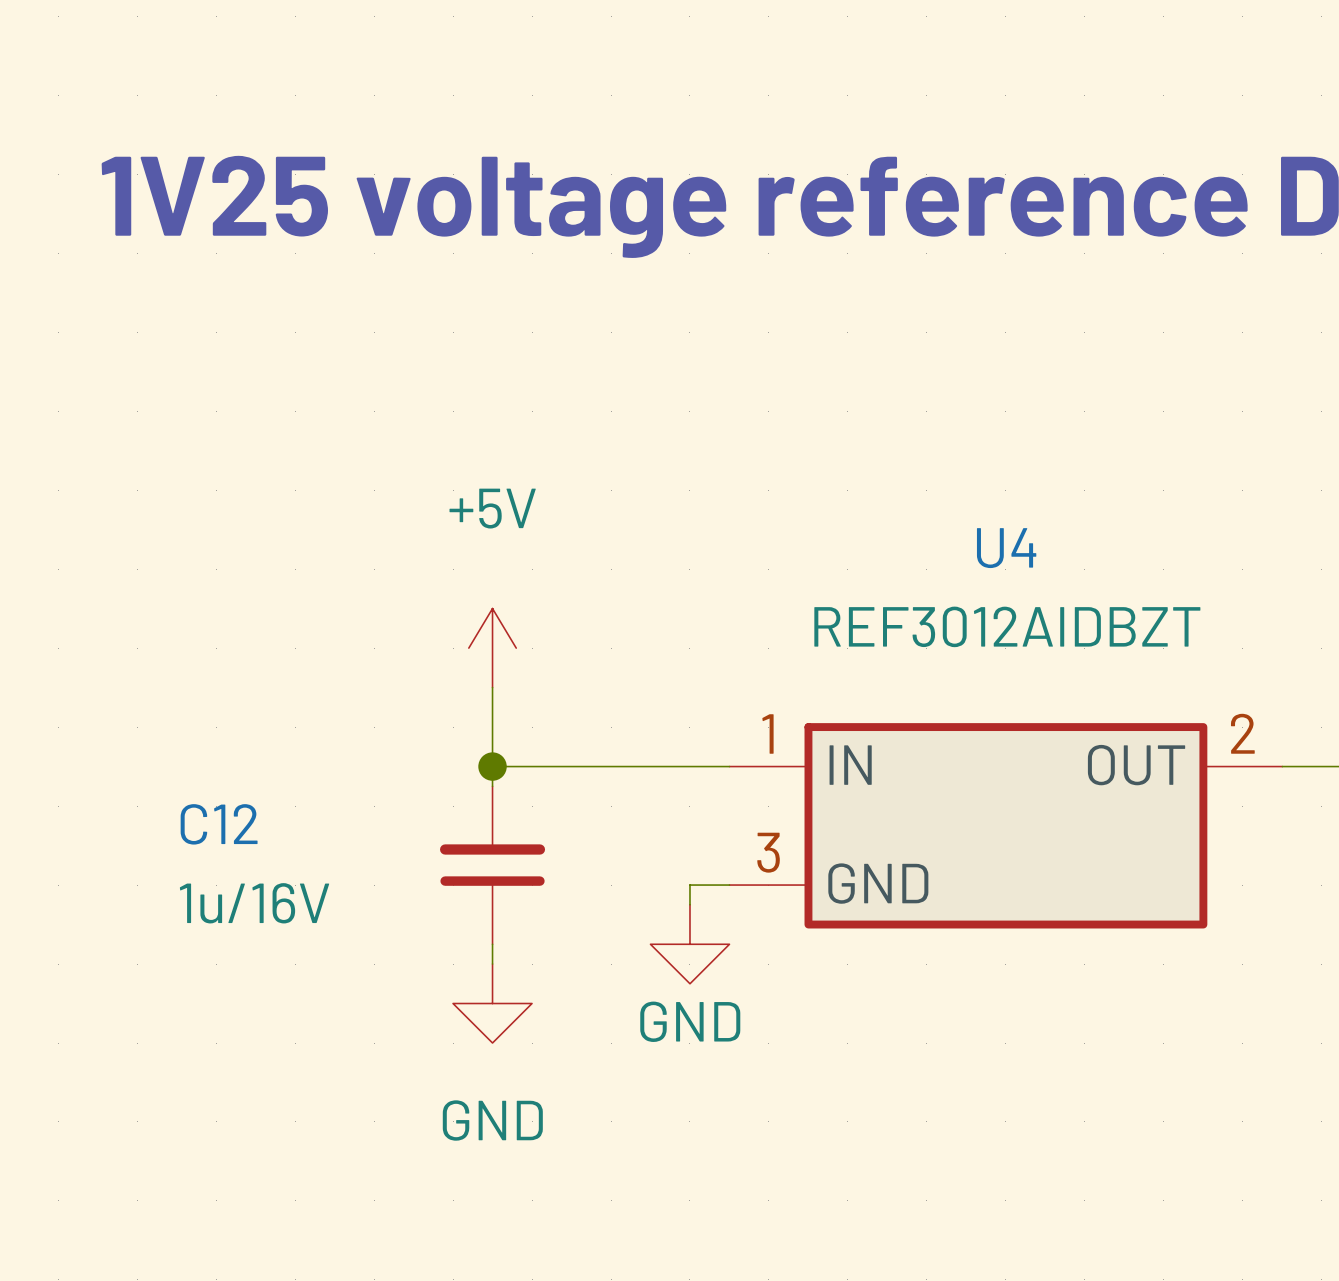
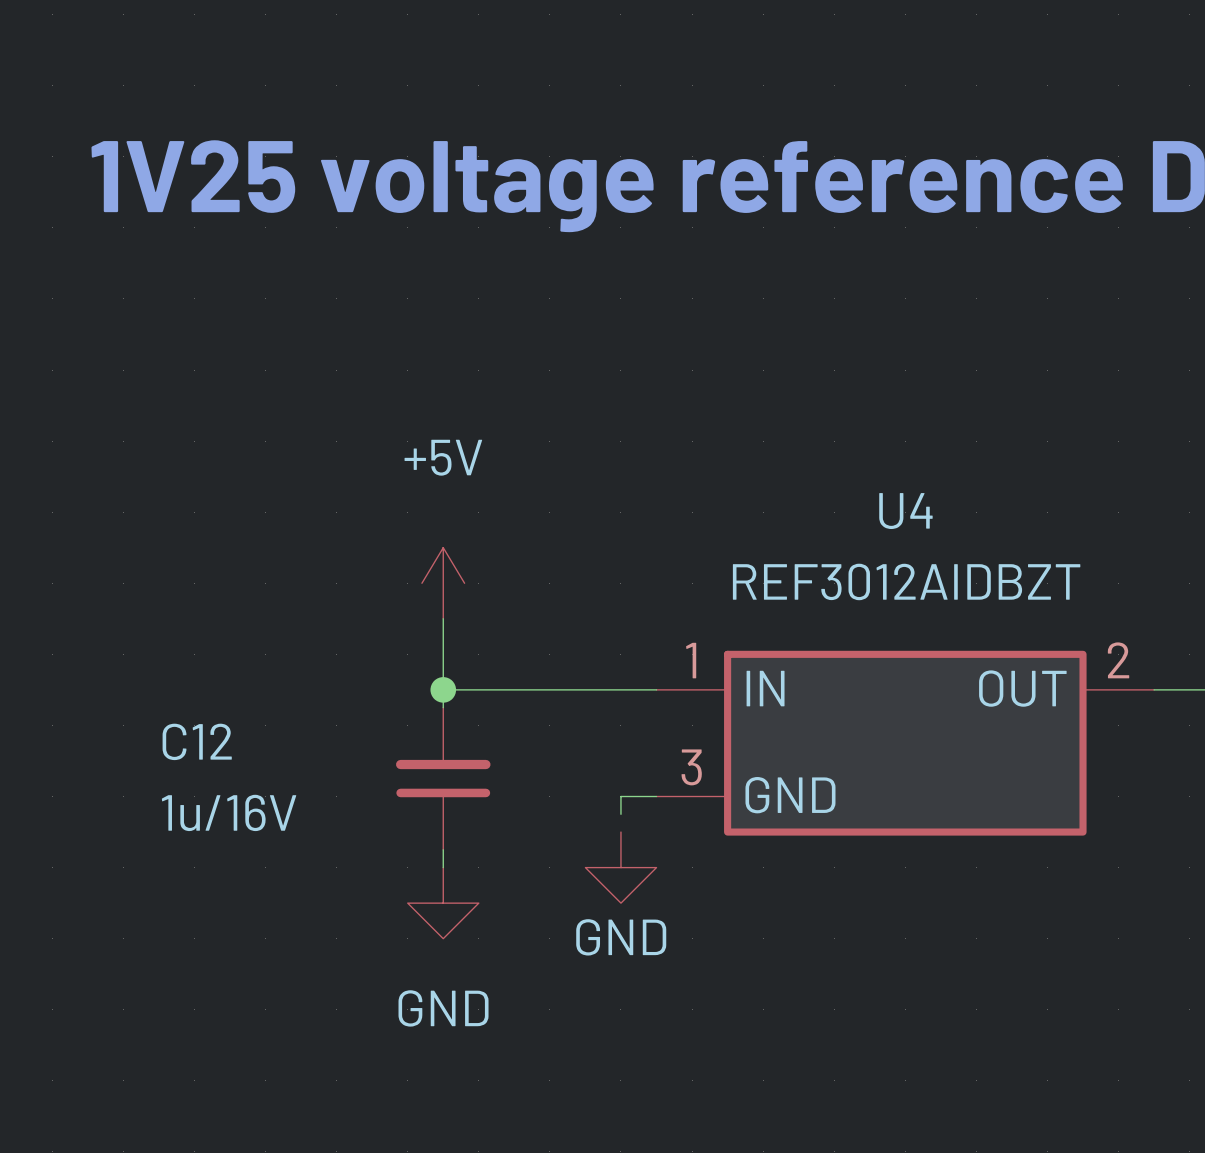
U4 name position: U4 (1006, 548) -> U4 (905, 511)
U4 value position: REF3012AIDBZT (1007, 626) -> REF3012AIDBZT (906, 581)
power symbol position: GND (689, 944) -> GND (620, 867)

